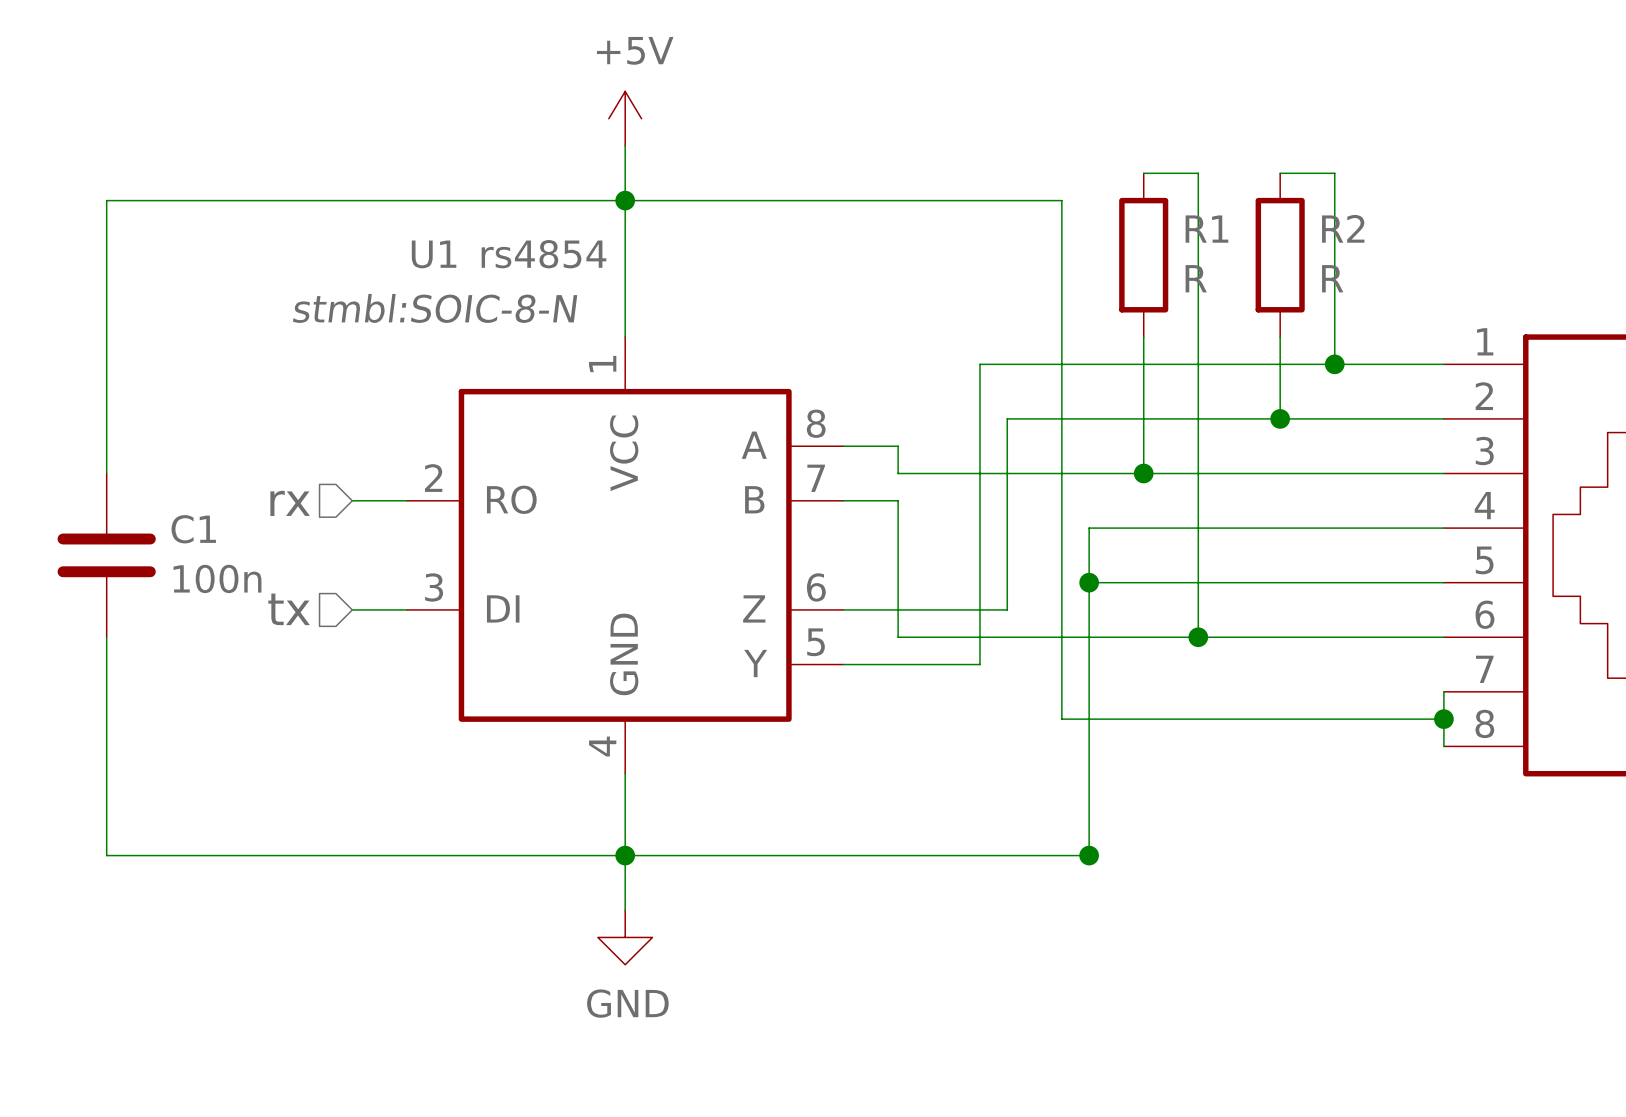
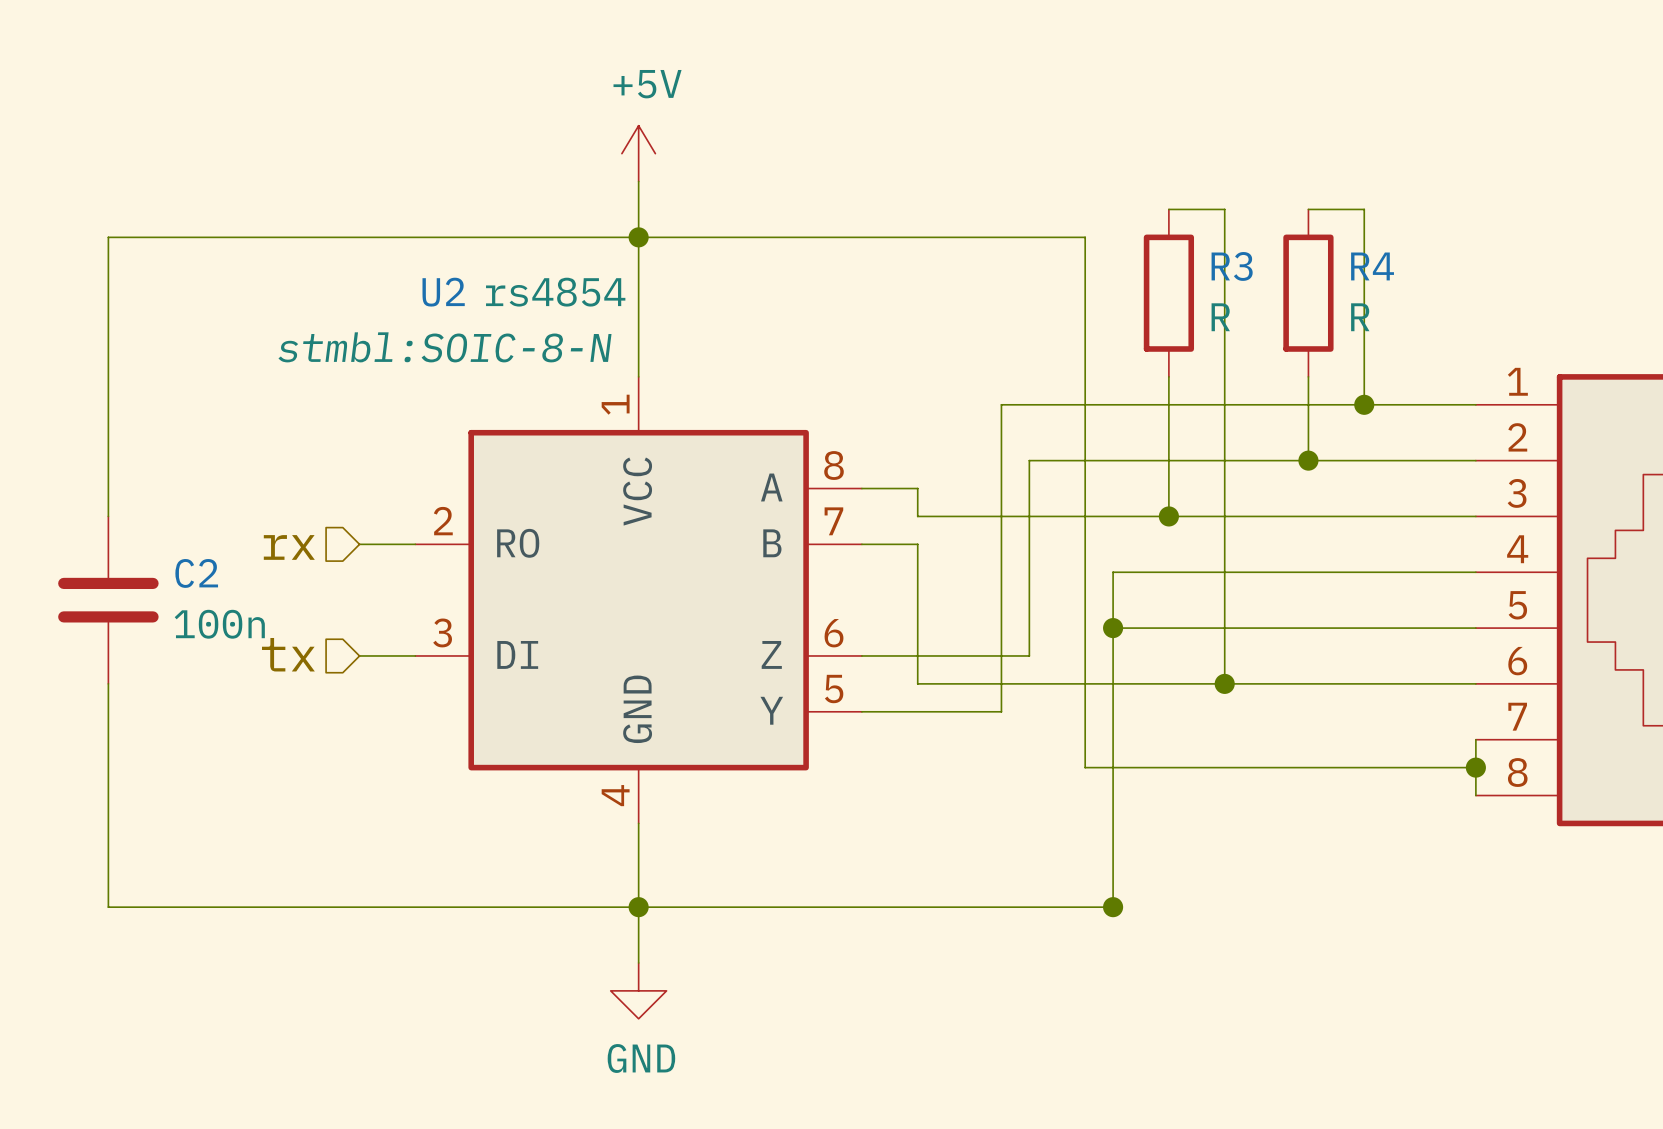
R2 name: R2 (1343, 228) -> R4 (1372, 266)
R1 name: R1 (1206, 229) -> R3 (1232, 266)
U1 name: U1 (434, 254) -> U2 (443, 292)
C1 name: C1 (193, 529) -> C2 (196, 573)

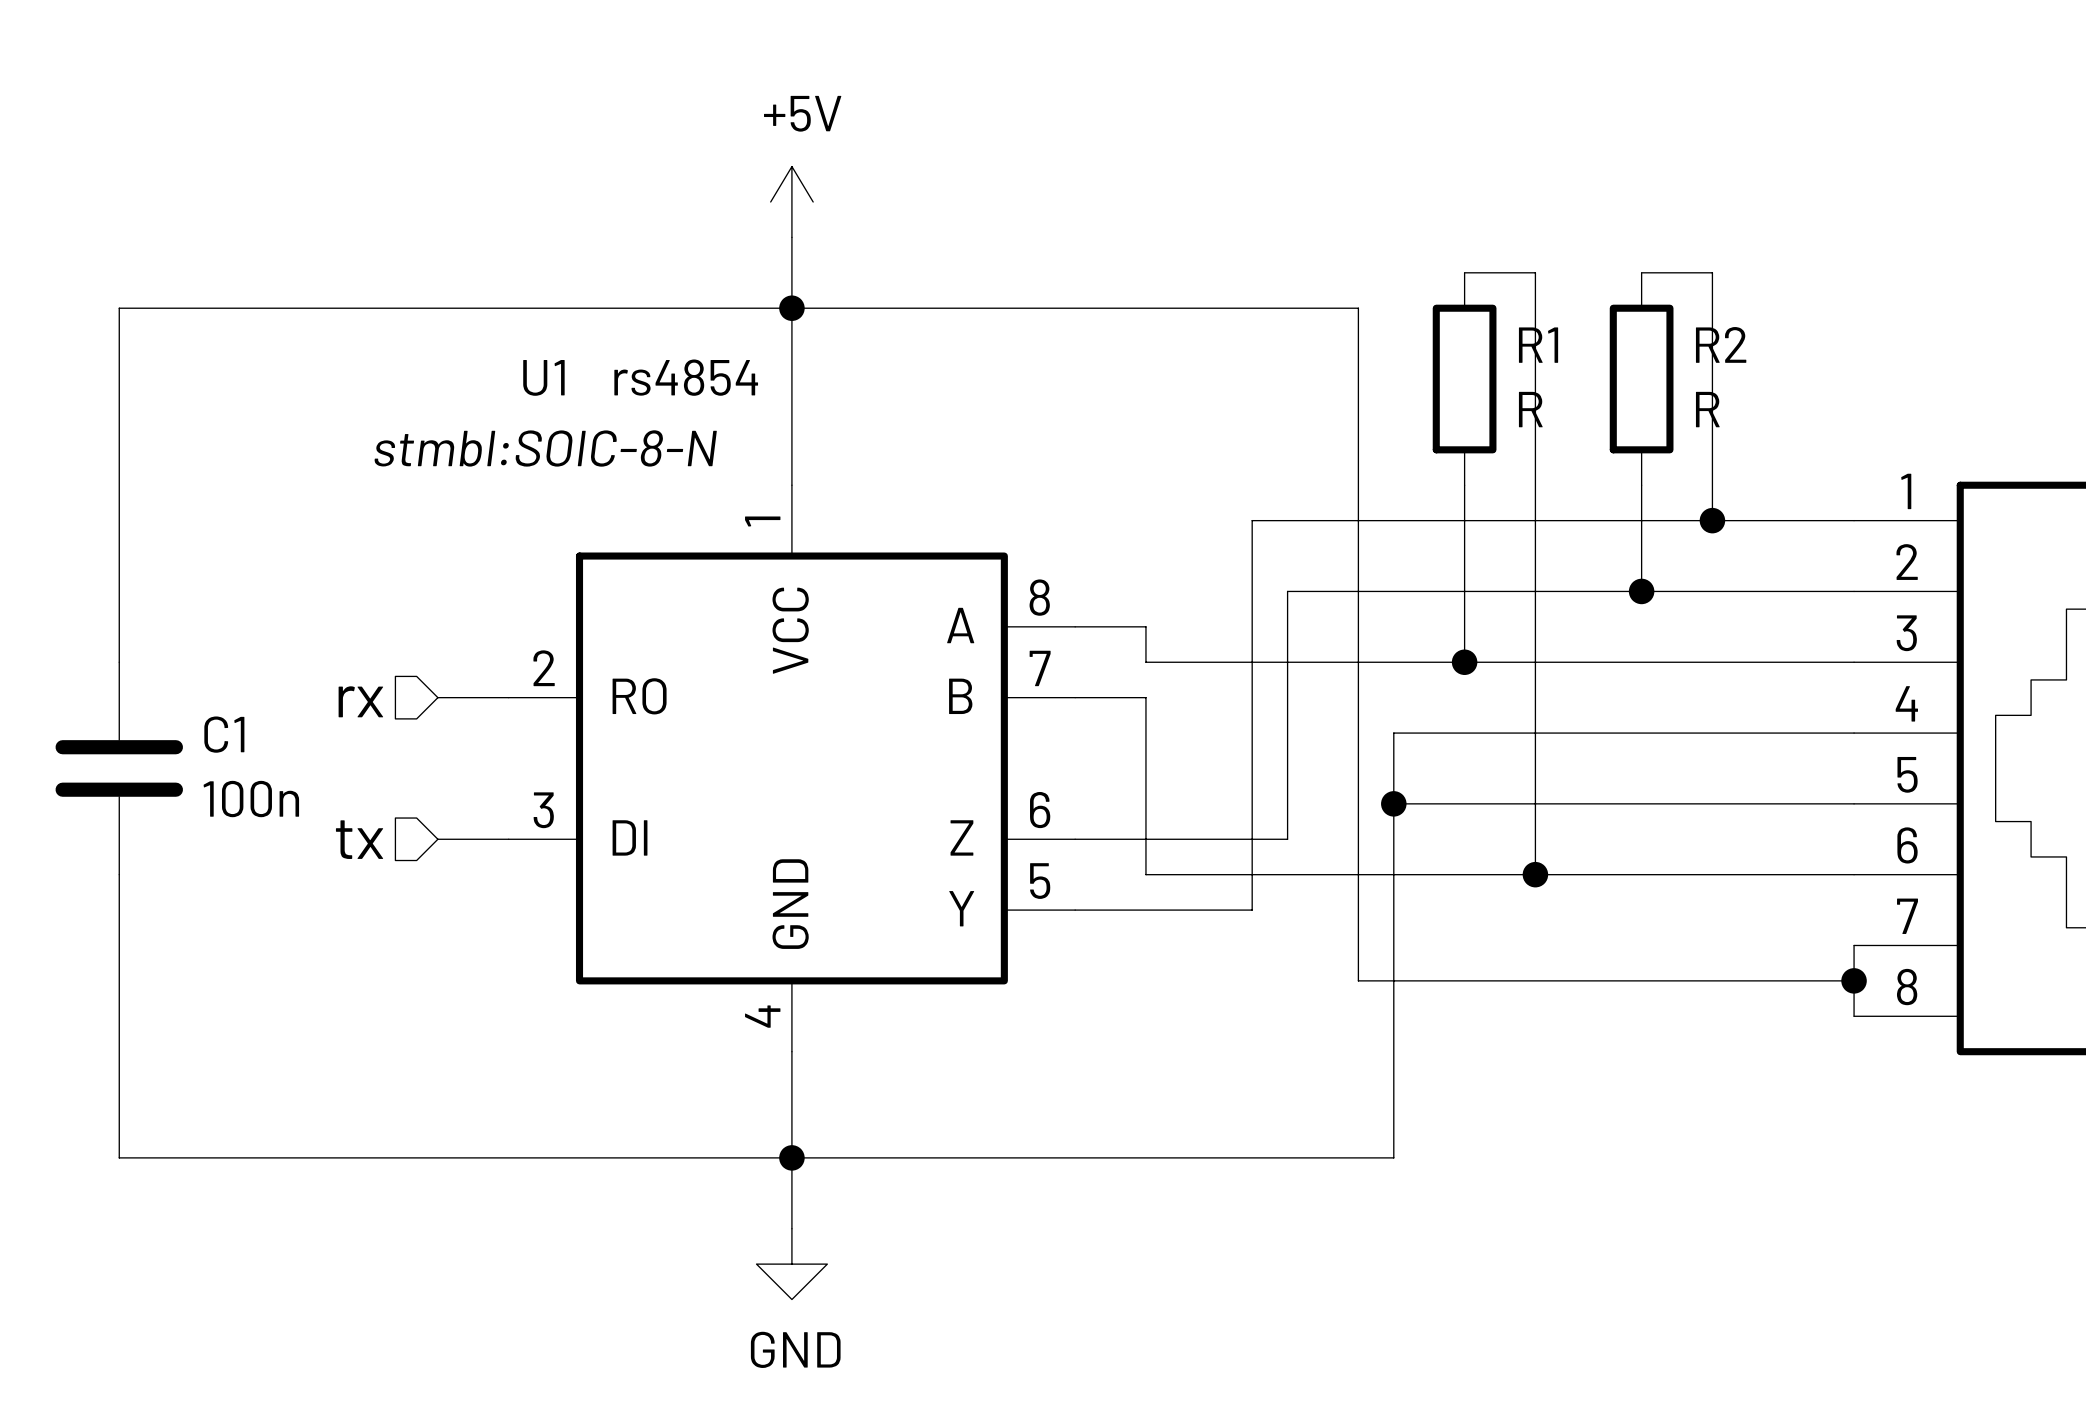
R3 name: R3 (1232, 266) -> R1 (1538, 345)
R4 name: R4 (1372, 266) -> R2 (1721, 344)
U2 name: U2 (443, 292) -> U1 (543, 377)
C2 name: C2 (196, 573) -> C1 (224, 734)
junction: (1113, 907) -> none

